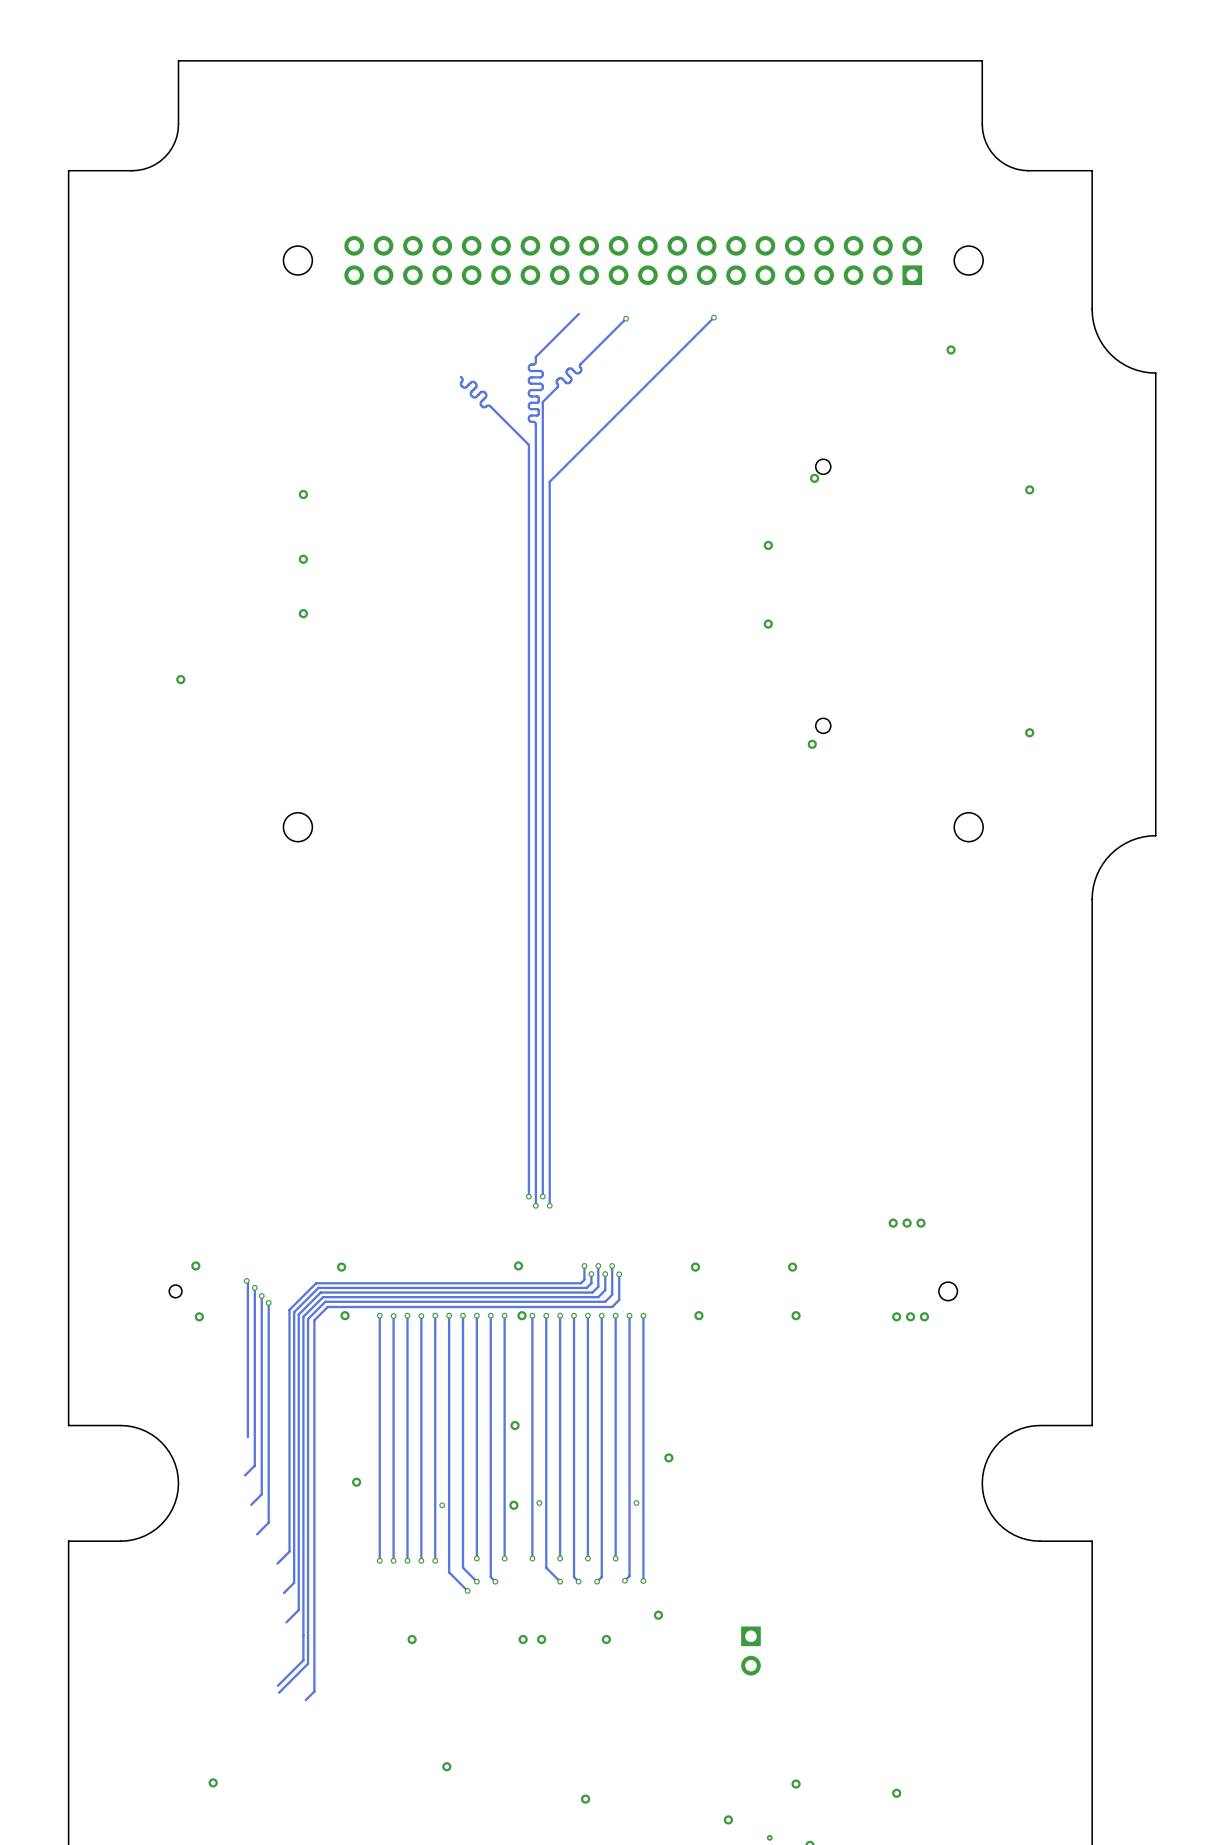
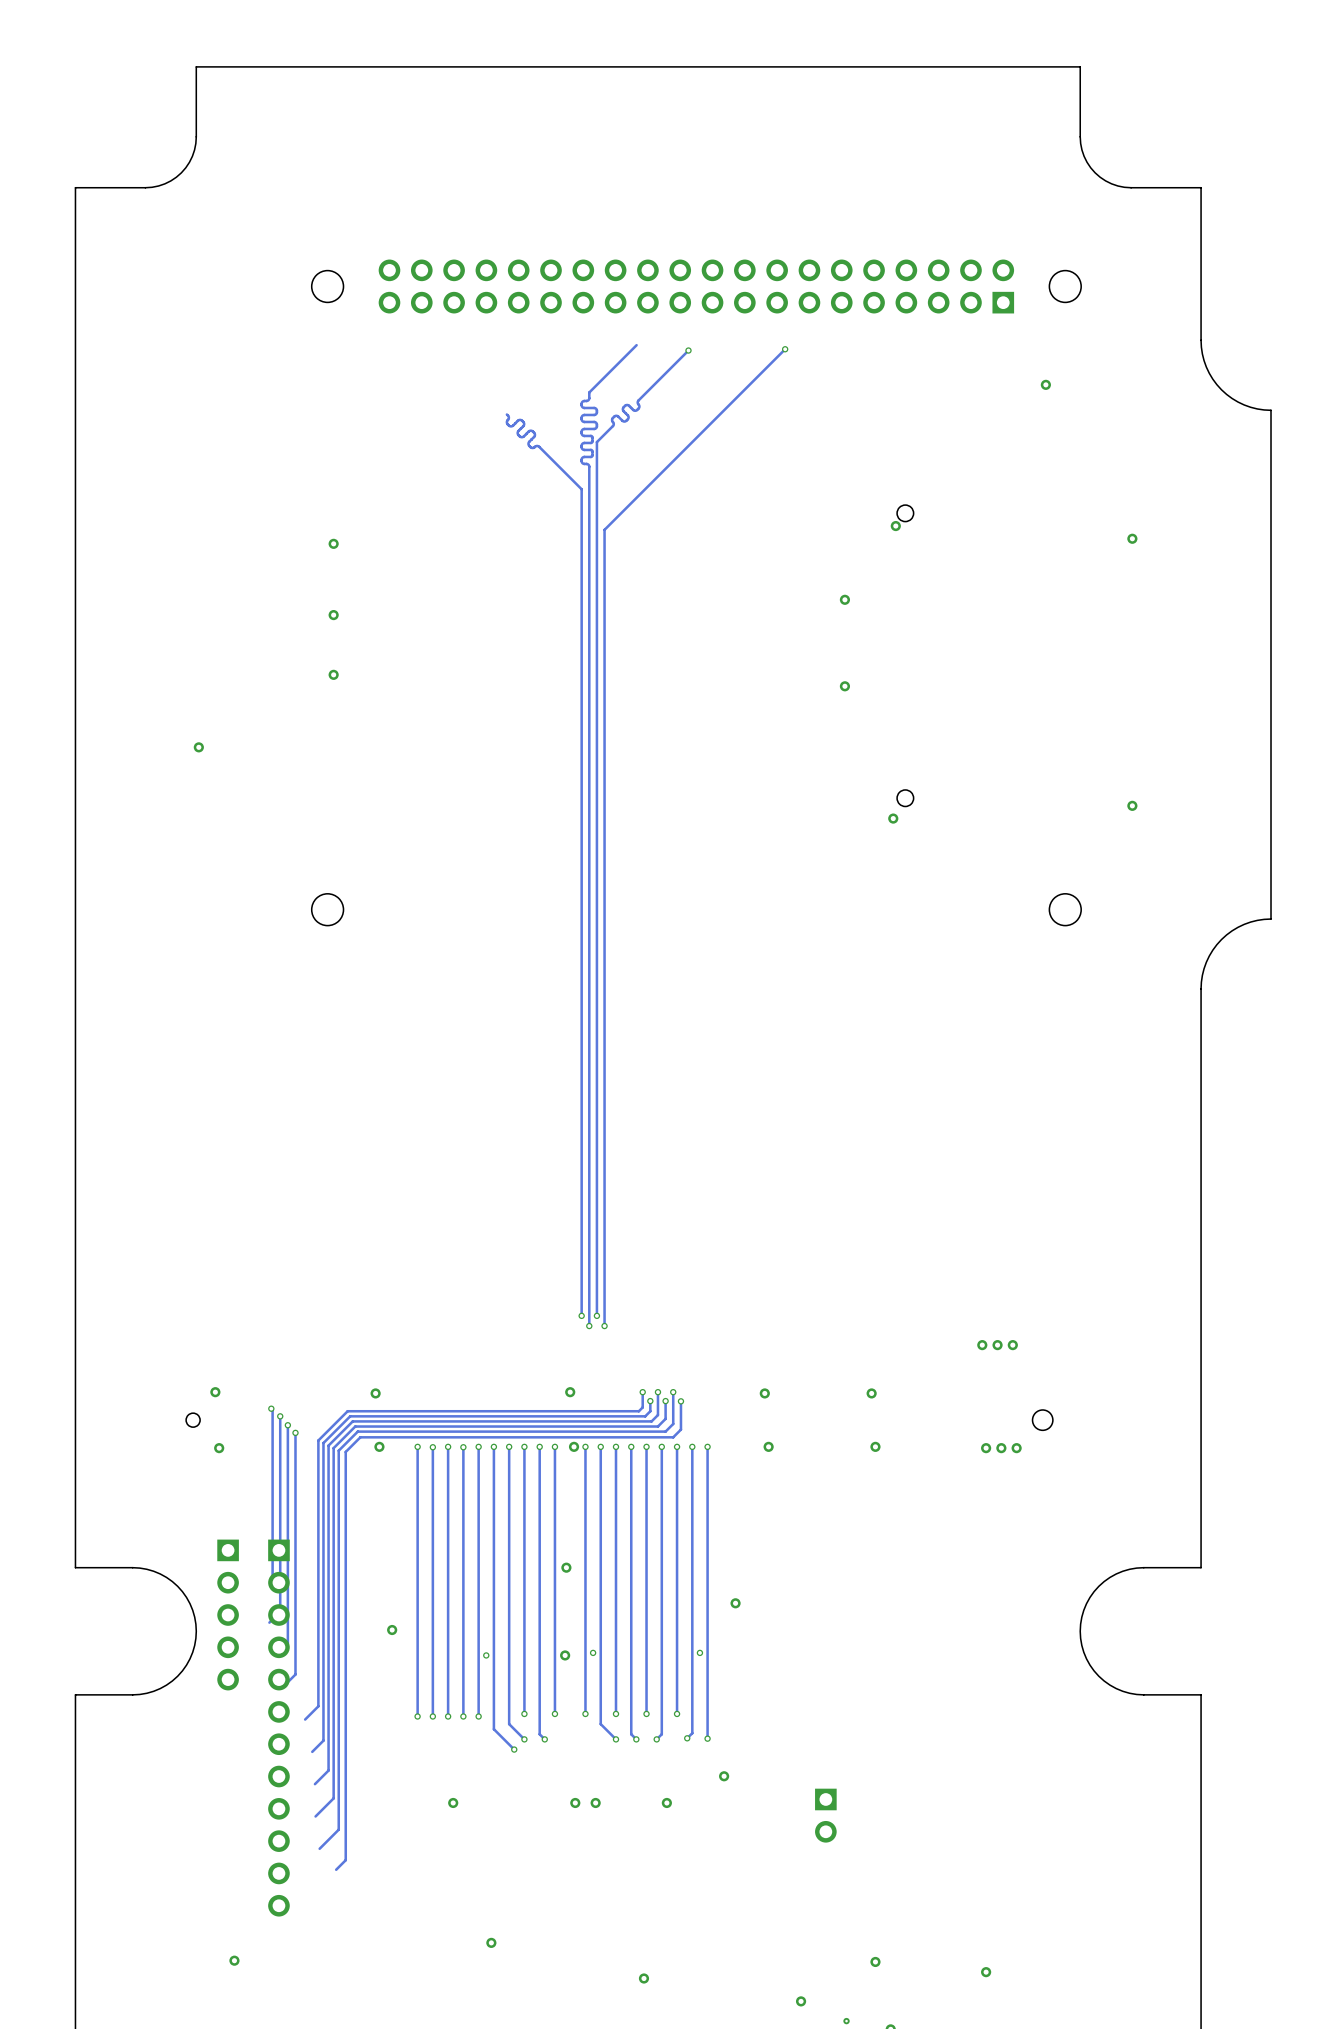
part: none -> (228, 1615)
part: none -> (278, 1728)
track: (303, 1635) (303, 1660) (277, 1685) -> (333, 1798) (315, 1816)
track: (290, 1681) (279, 1692) -> none

